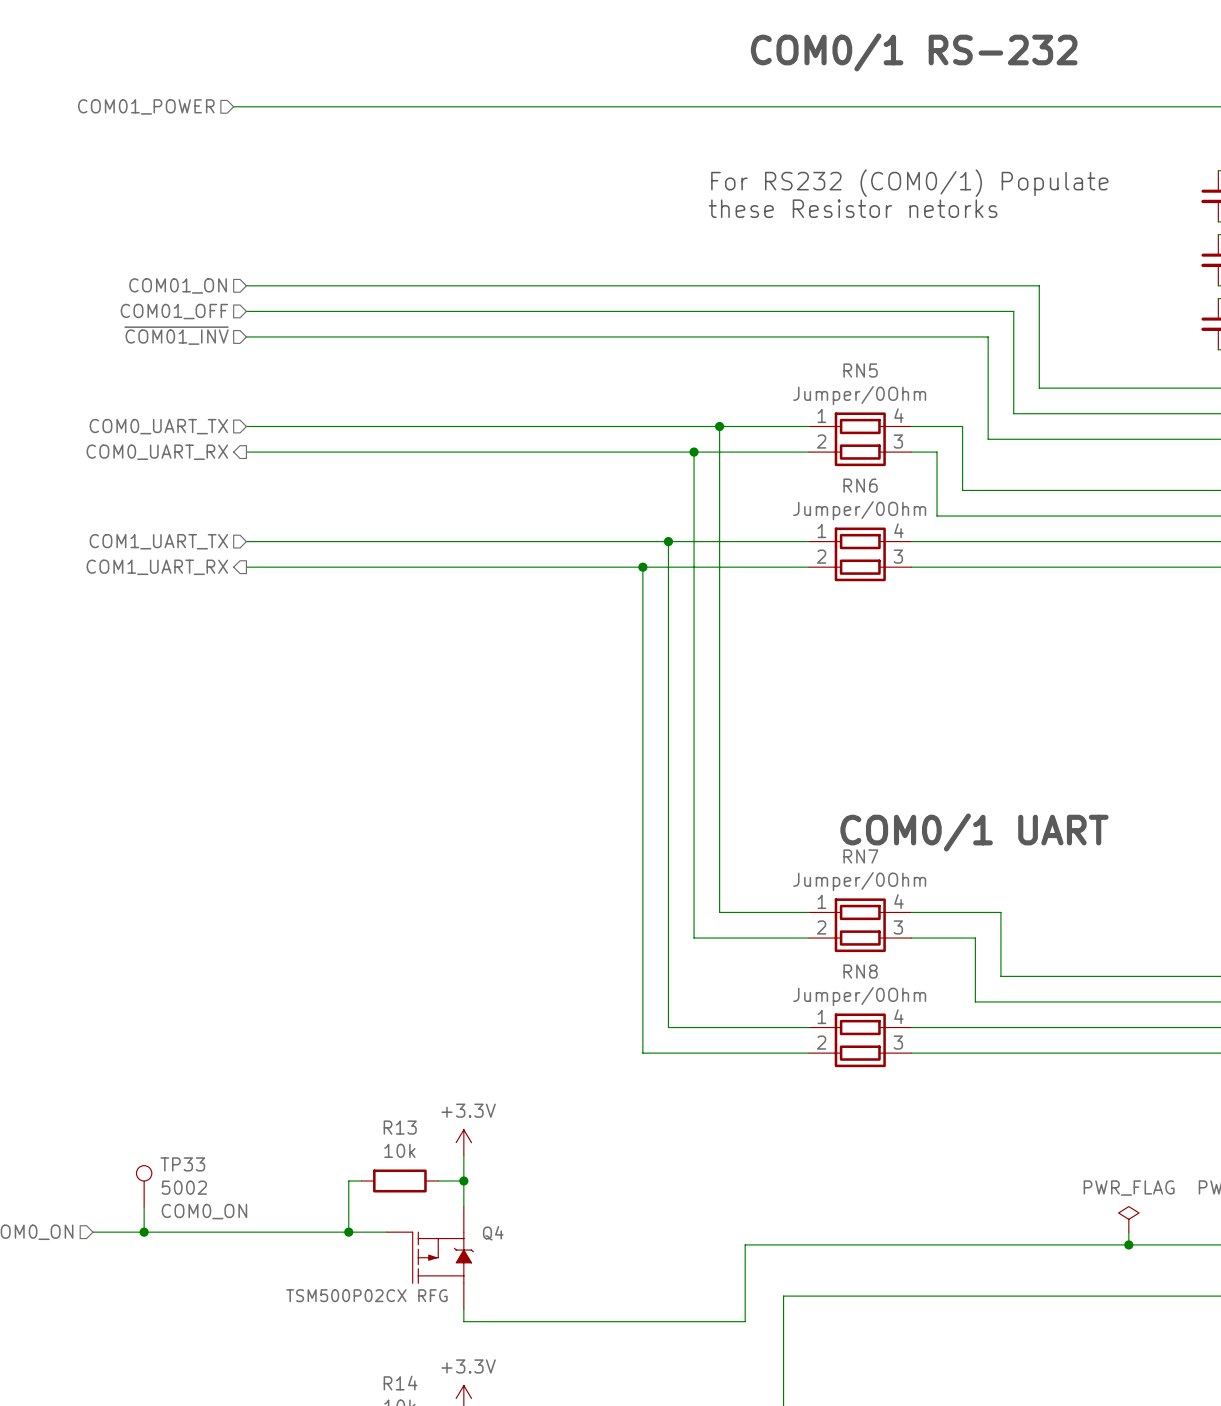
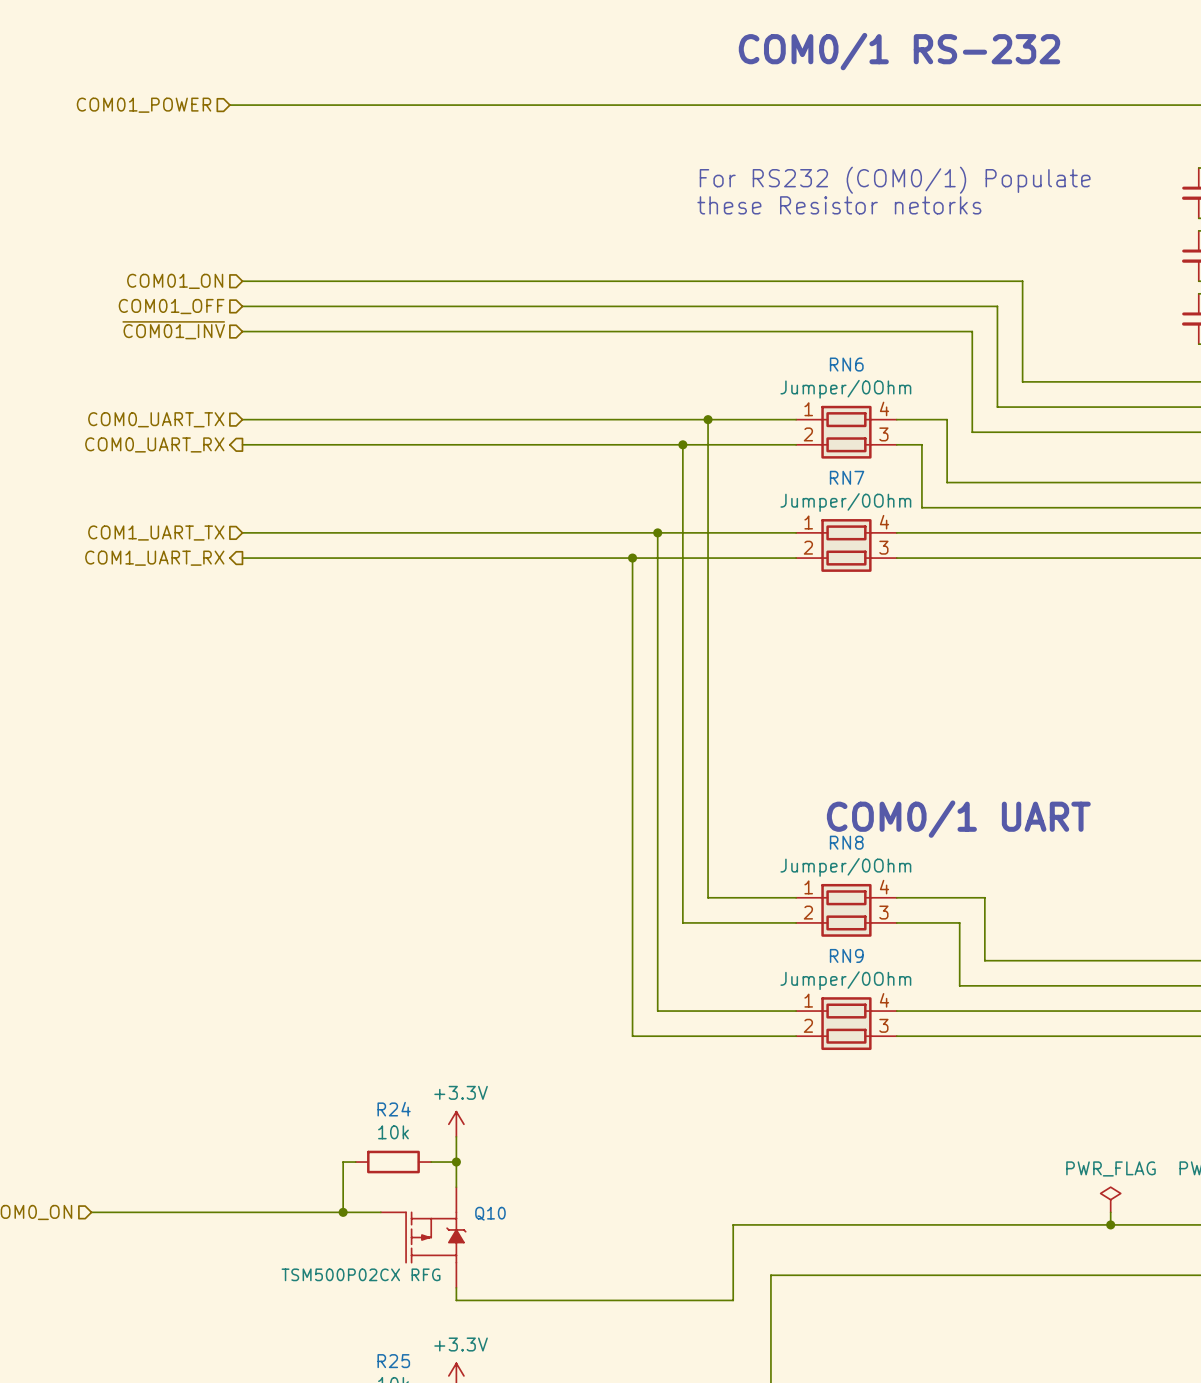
RN5 name: RN5 (860, 370) -> RN6 (846, 364)
RN6 name: RN6 (860, 485) -> RN7 (847, 477)
RN7 name: RN7 (860, 856) -> RN8 (846, 842)
RN8 name: RN8 (860, 971) -> RN9 (846, 955)
R13 name: R13 (400, 1127) -> R24 (394, 1109)
TP33: 5002 (144, 1186) -> none
wire: (144, 1206) (144, 1232) -> none
junction: (144, 1232) -> none
Q4 name: Q4 (493, 1233) -> Q10 (490, 1213)
R14 name: R14 (400, 1383) -> R25 (393, 1361)

